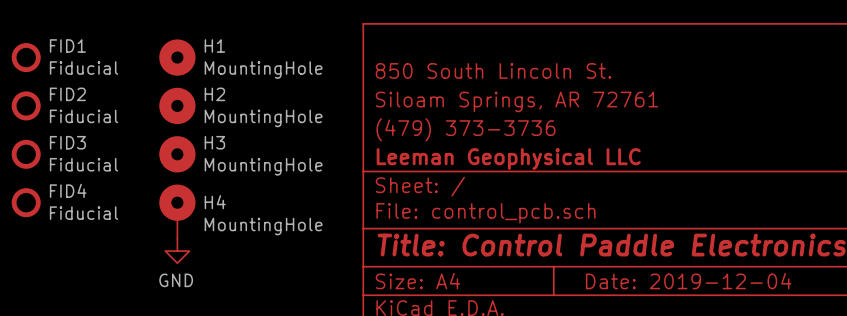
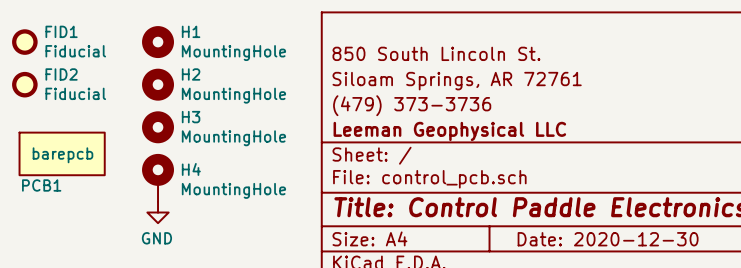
FID3: Fiducial (26, 154) -> none
PCB1: none -> barepcb (62, 153)
FID4: Fiducial (26, 202) -> none
title block: Date: 2019-12-04 (688, 281) -> Date: 2020-12-30 (608, 239)

